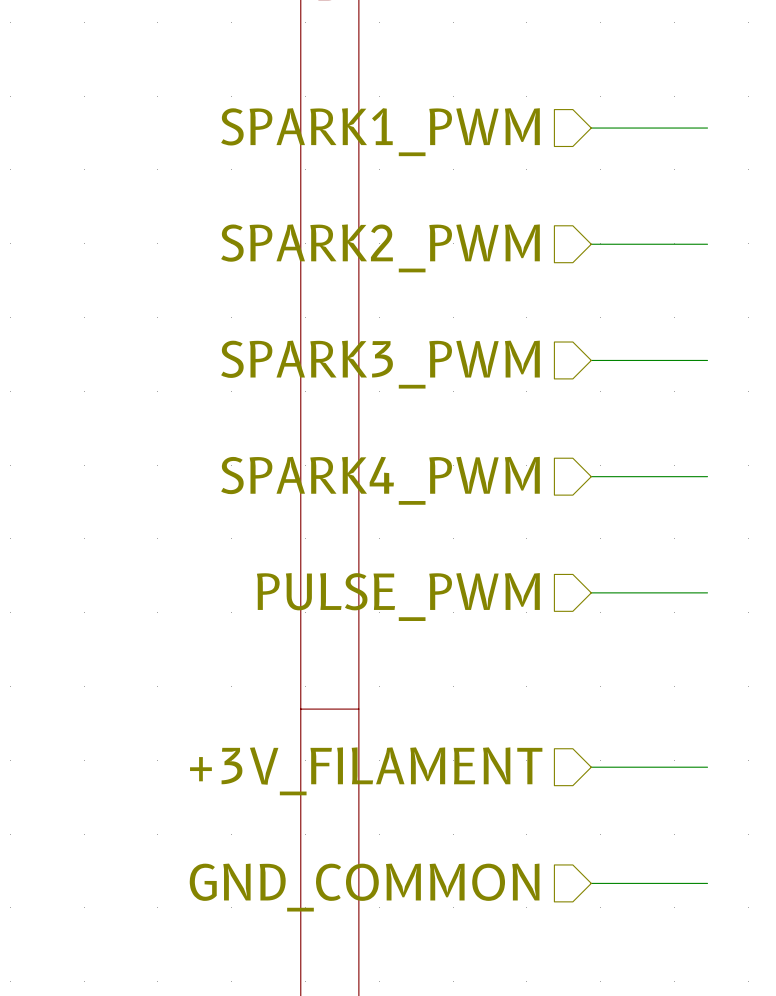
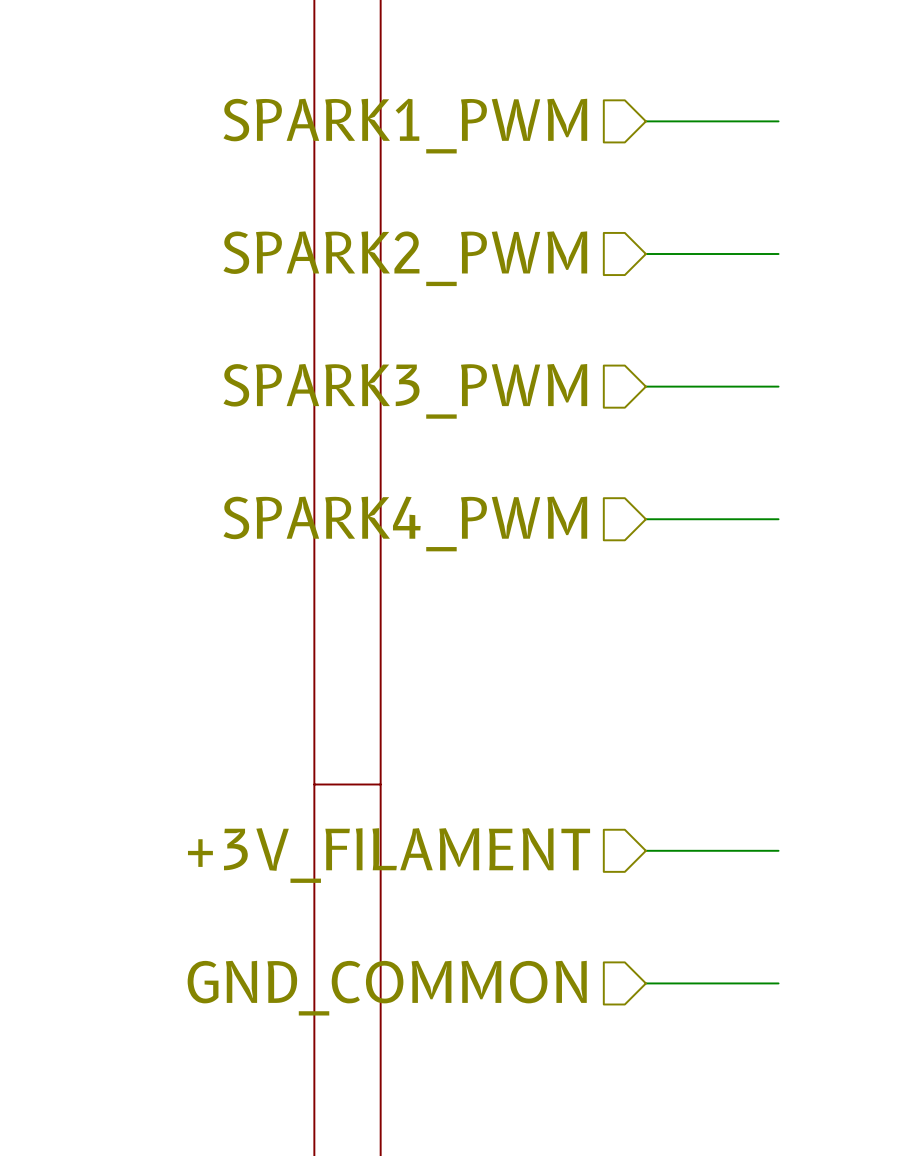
wire: (591, 592) (707, 592) -> none
hierarchical label: PULSE_PWM (398, 597) -> none

